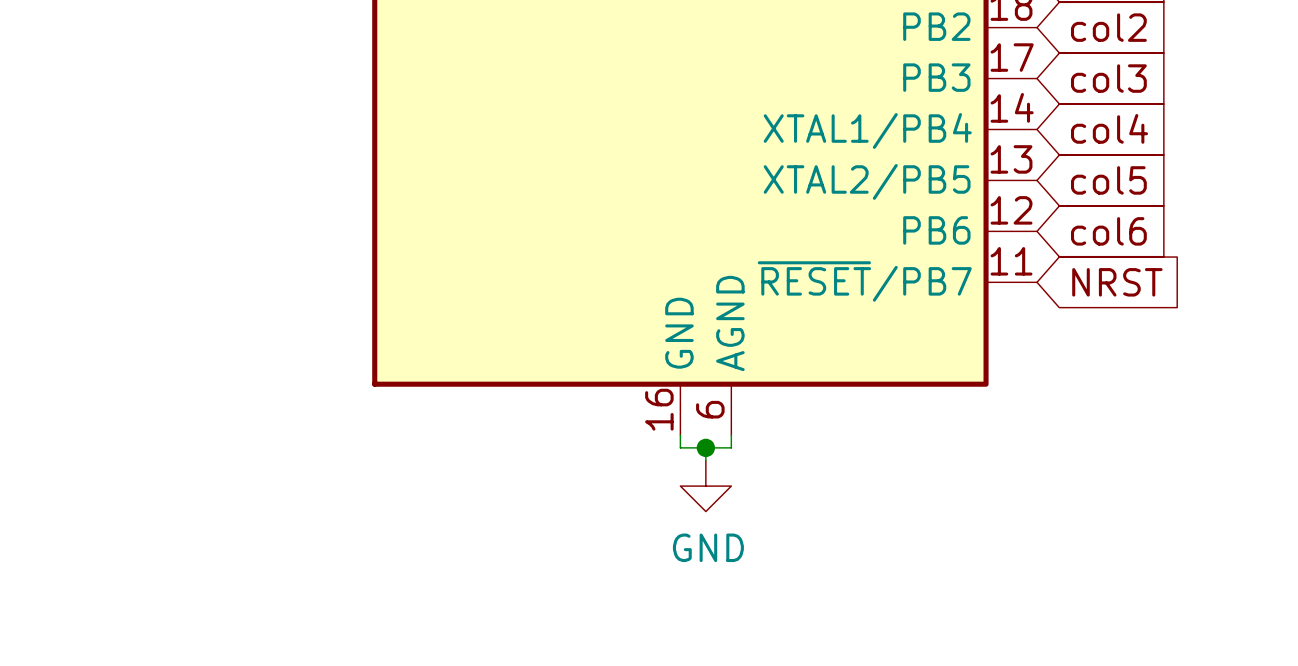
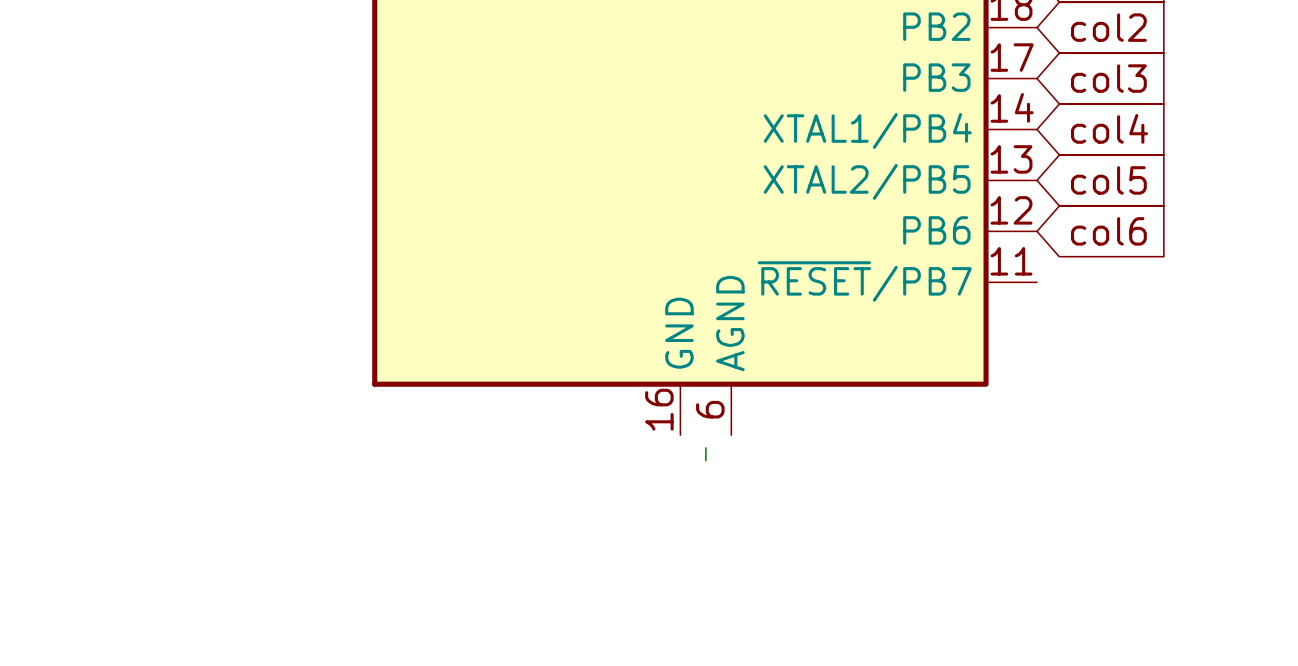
global label: NRST (1117, 282) -> none
wire: (680, 435) (680, 447) (731, 447) (731, 435) -> none
junction: (705, 447) -> none
power symbol: GND (705, 486) -> none

